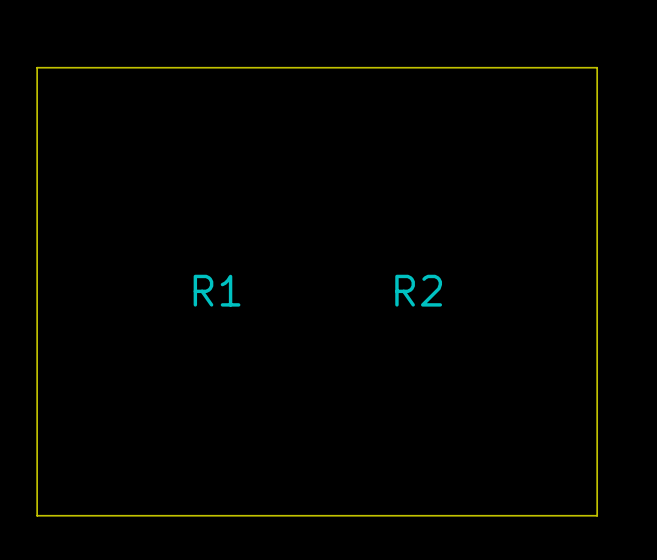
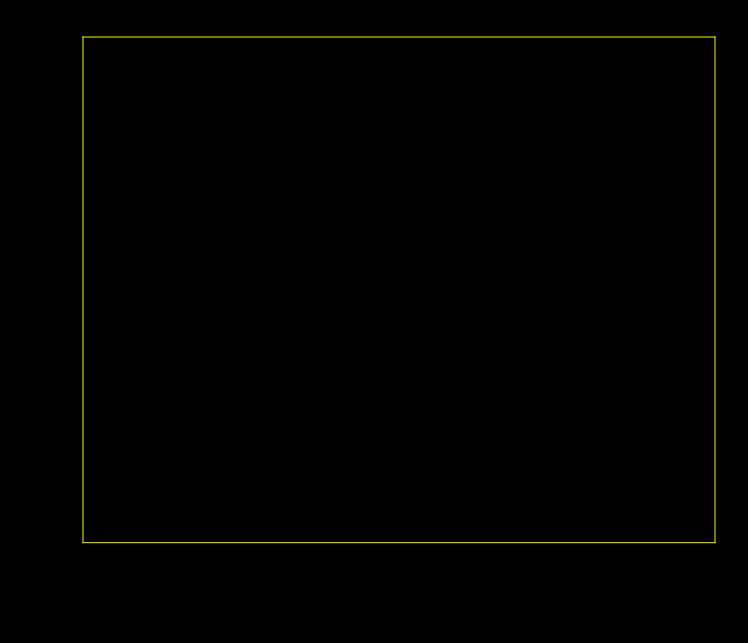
R1: (217, 290) -> none
R2: (418, 290) -> none

